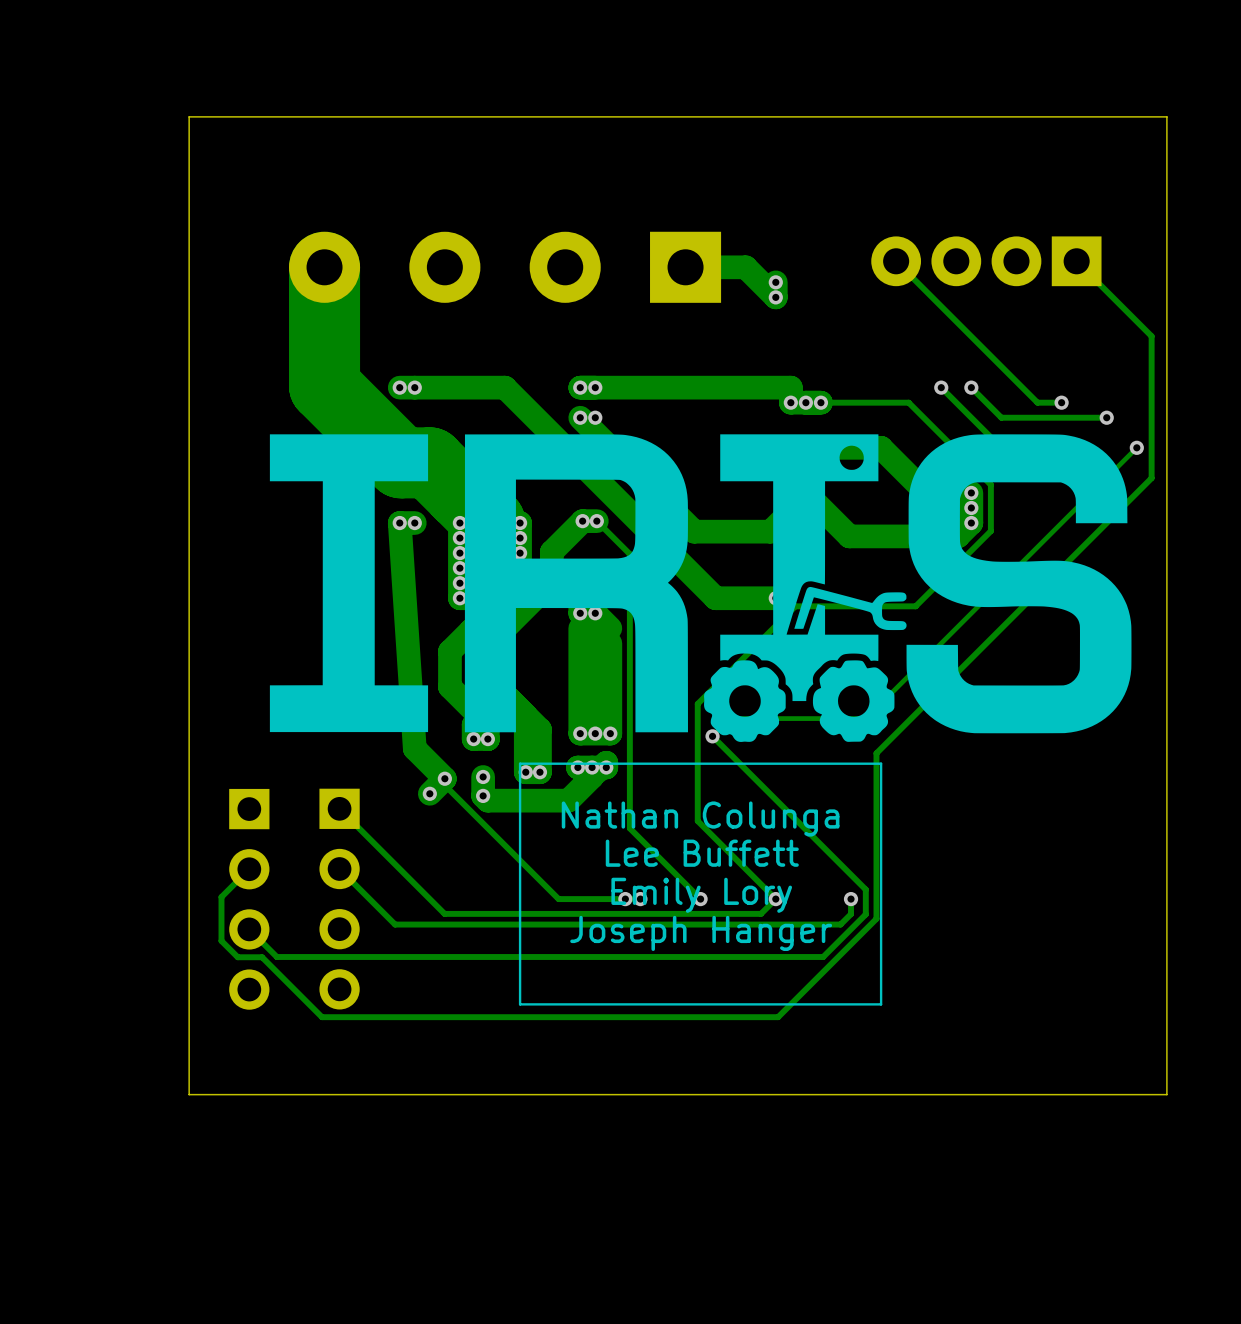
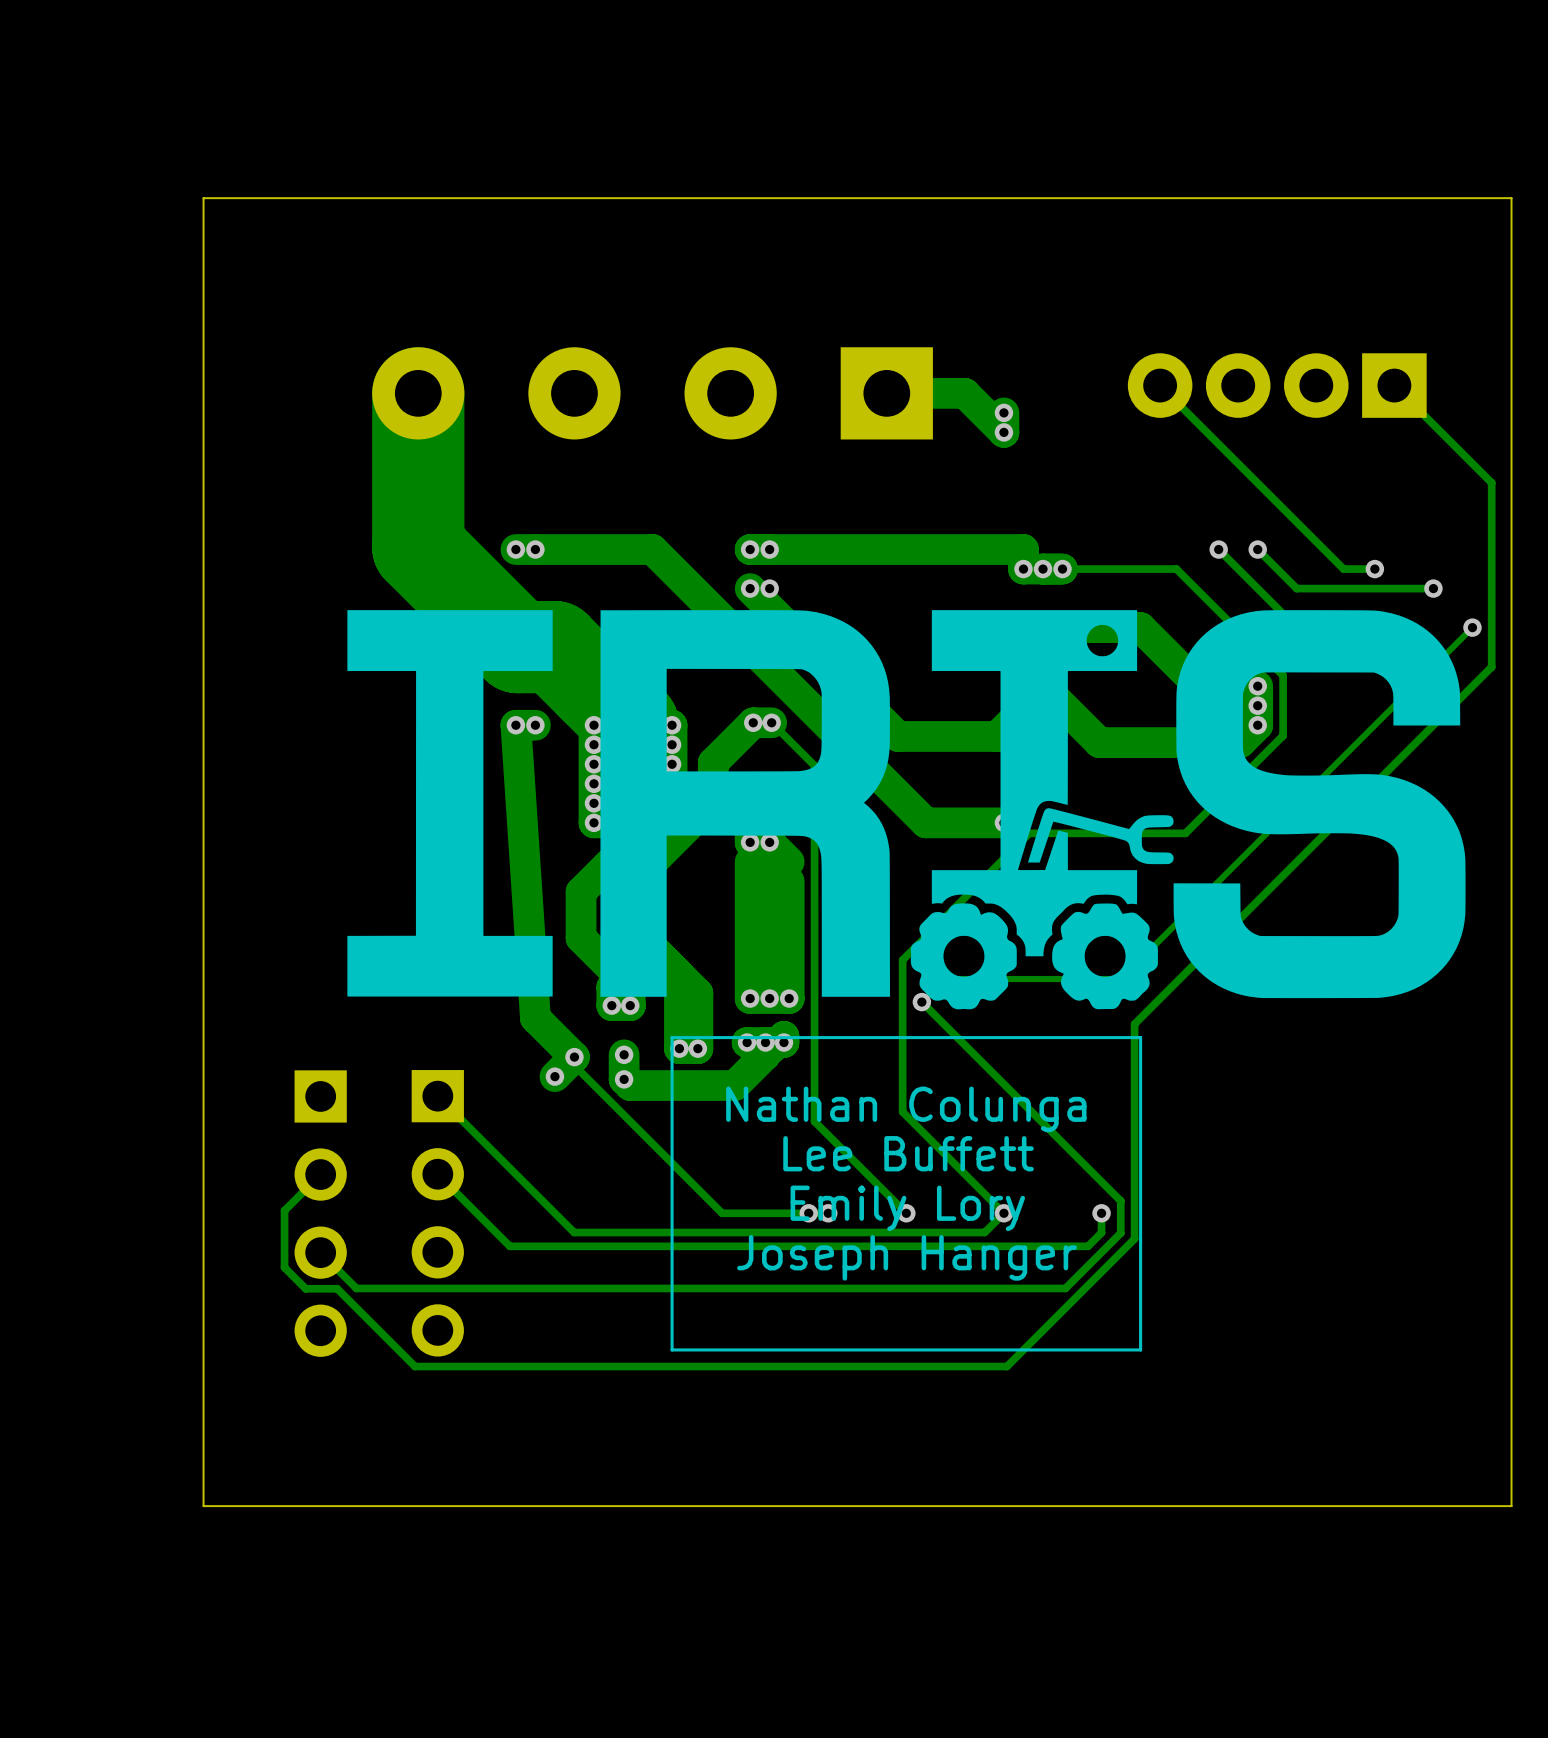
board edge: (189, 116) (189, 1094) (1166, 1094) -> (242, 198) (203, 198) (203, 1506) (1511, 1506) (1511, 1467)

